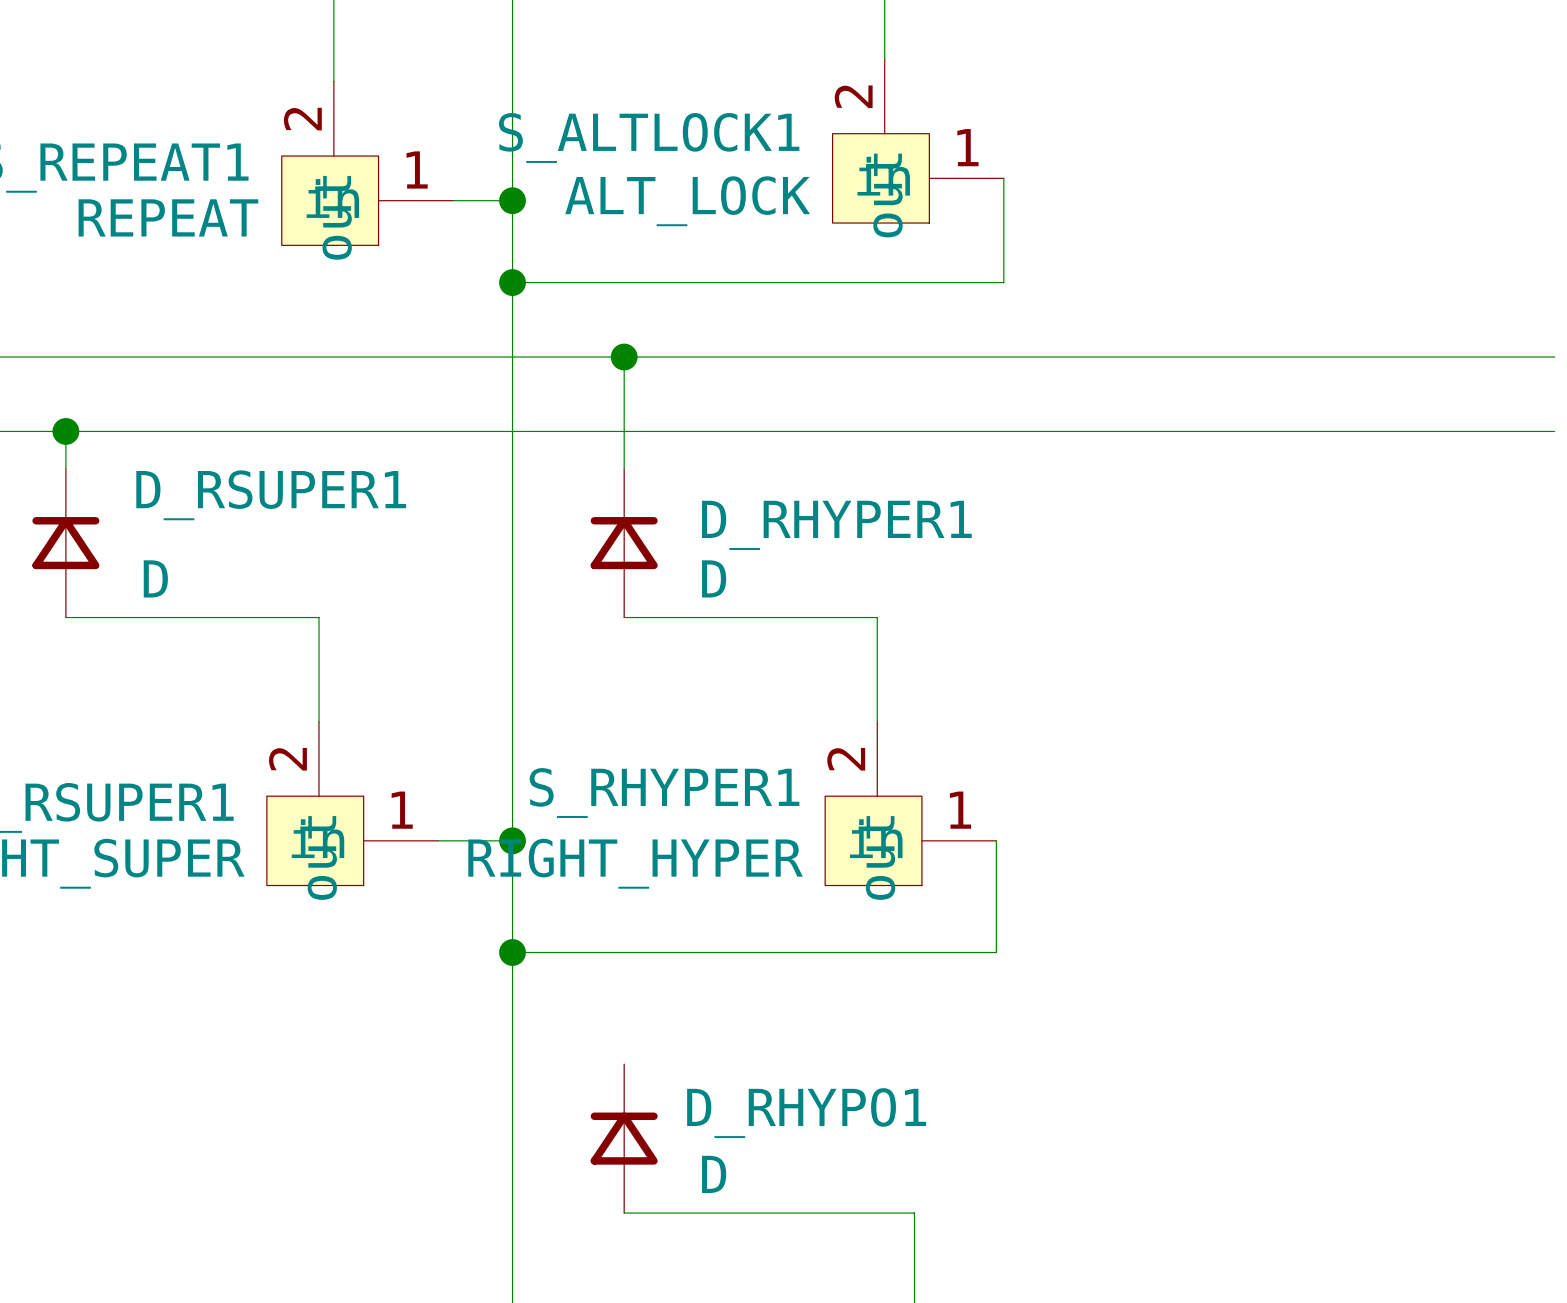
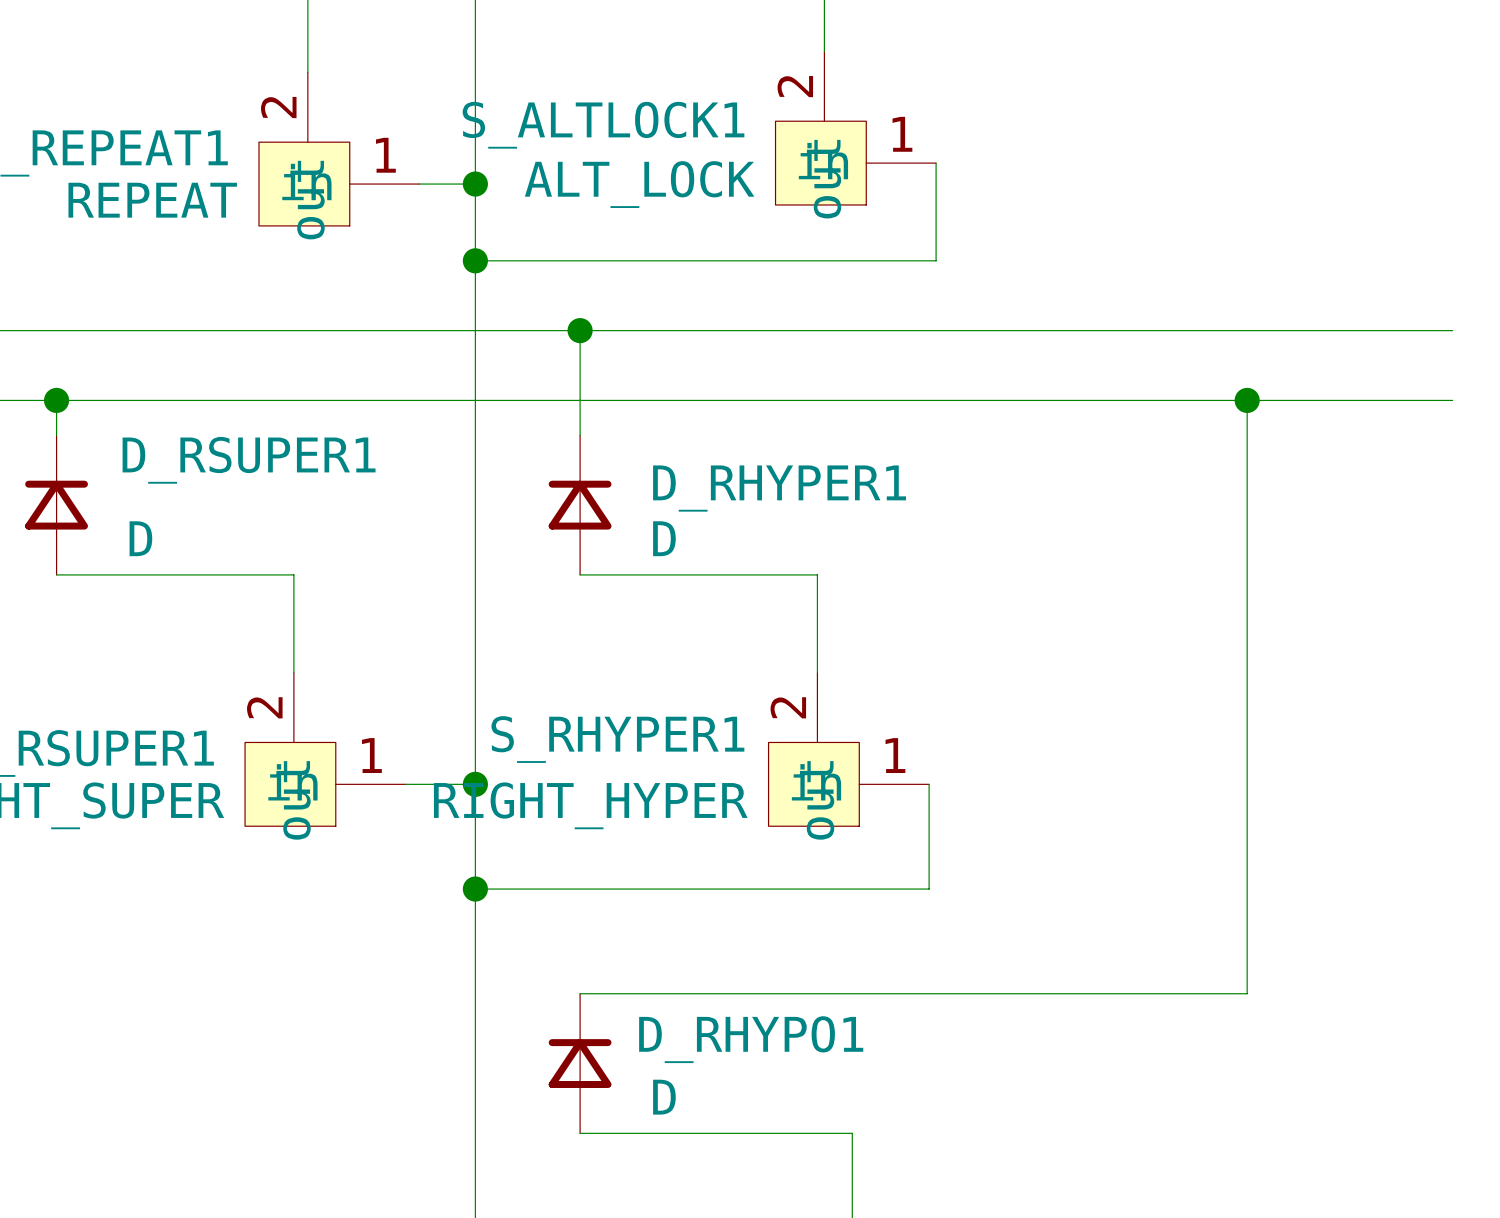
wire: none -> (1247, 400) (1247, 993) (580, 993)
junction: none -> (1247, 400)

